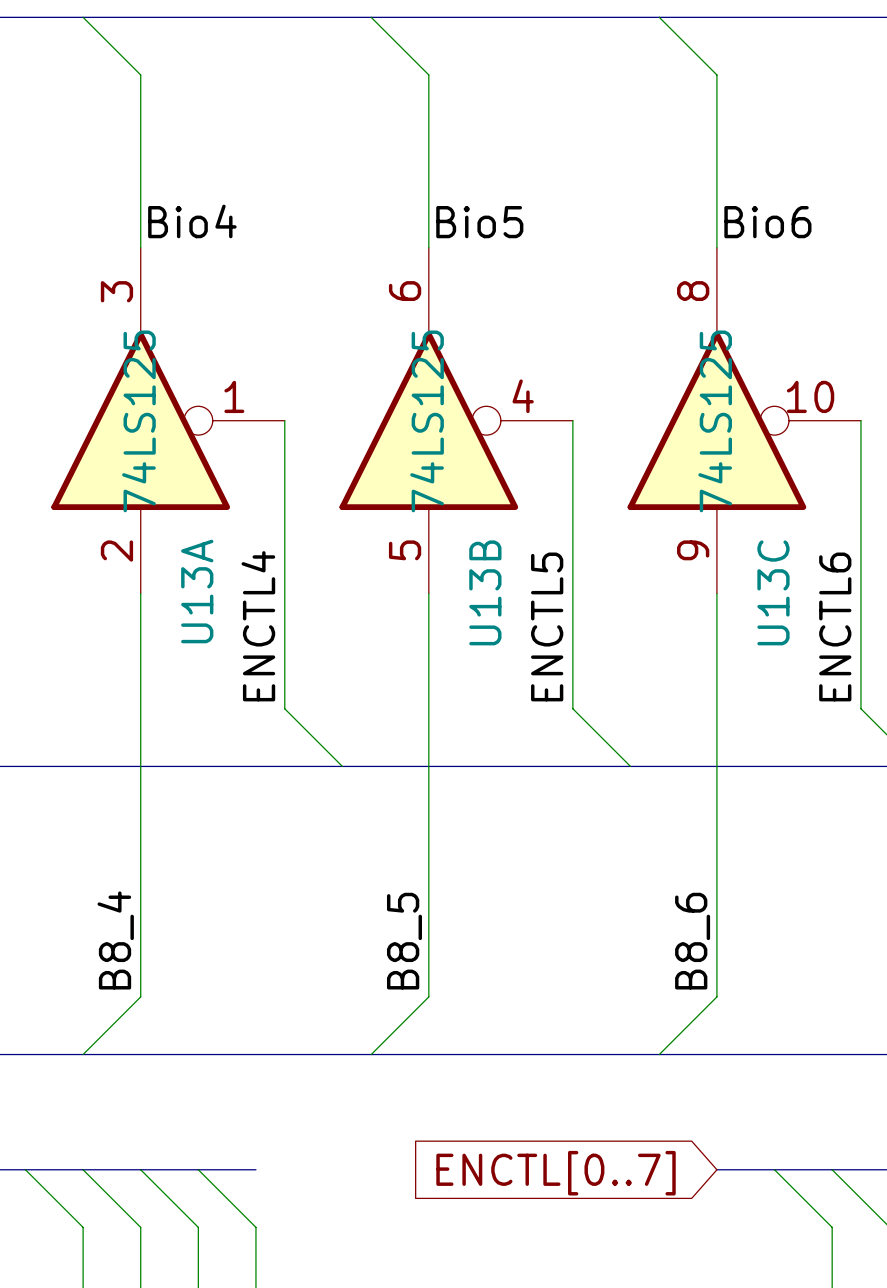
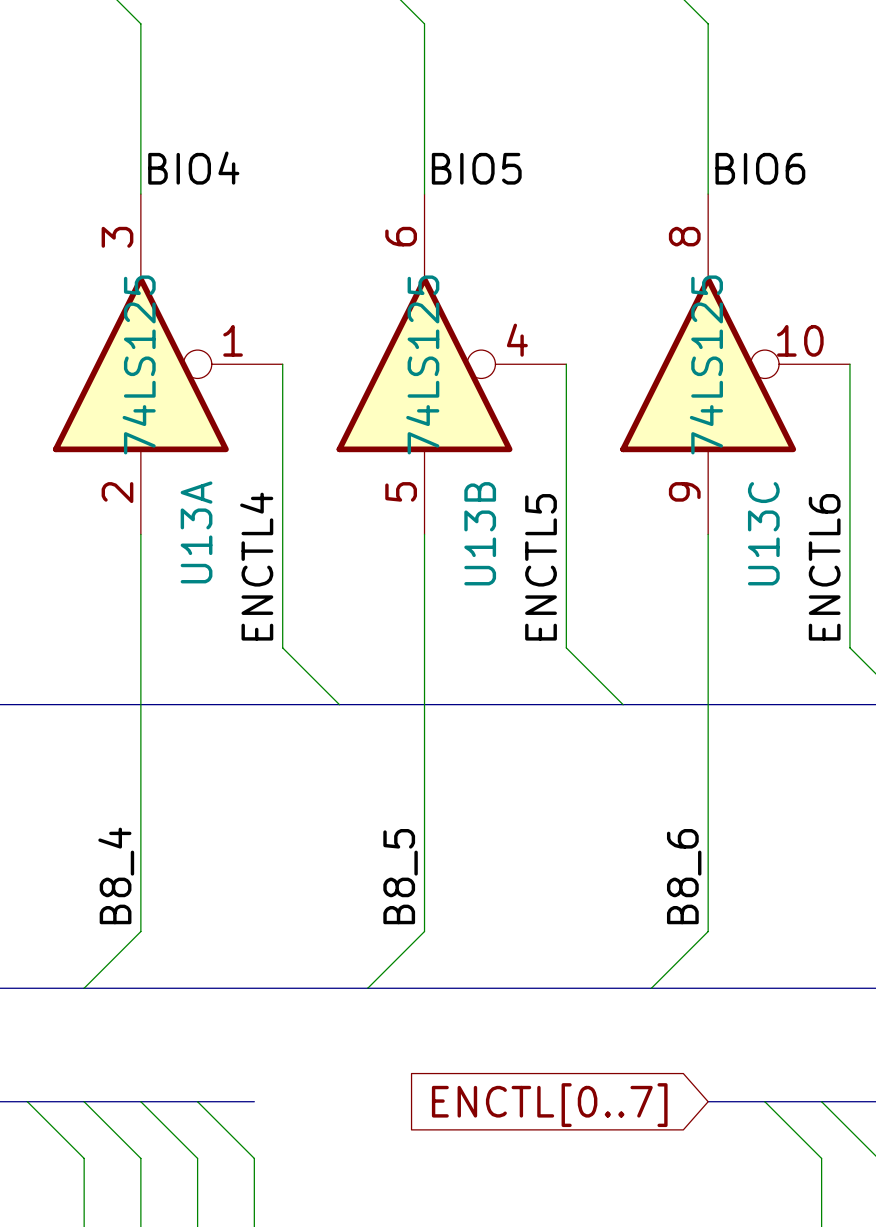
label: Bio4 (192, 221) -> BIO4 (193, 168)
label: Bio5 (479, 222) -> BIO5 (476, 168)
label: Bio6 (767, 222) -> BIO6 (760, 168)

